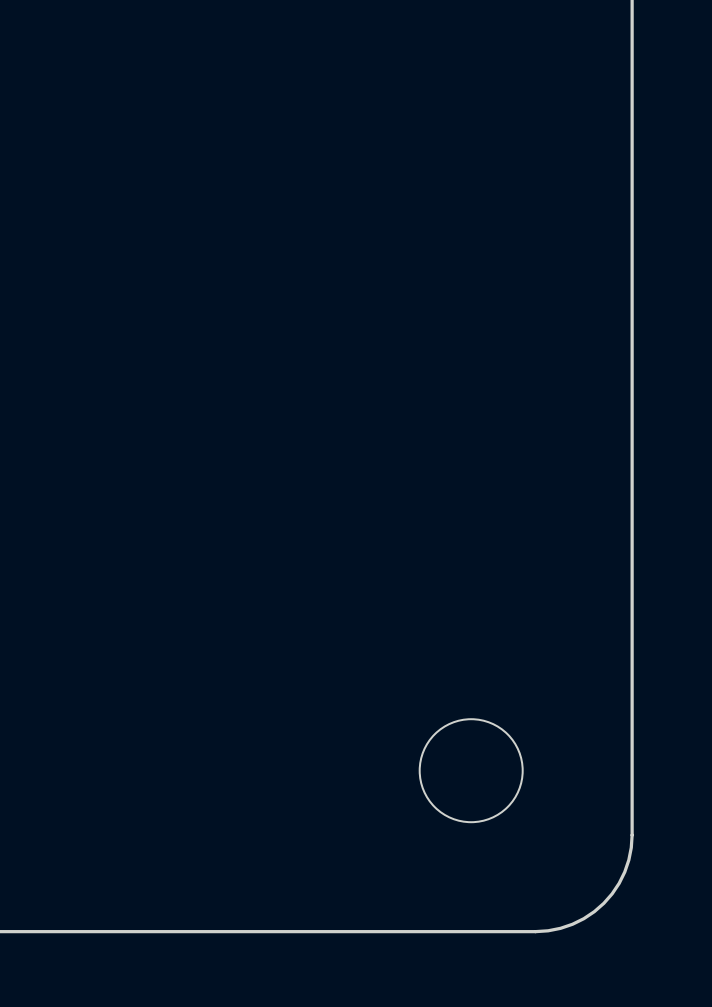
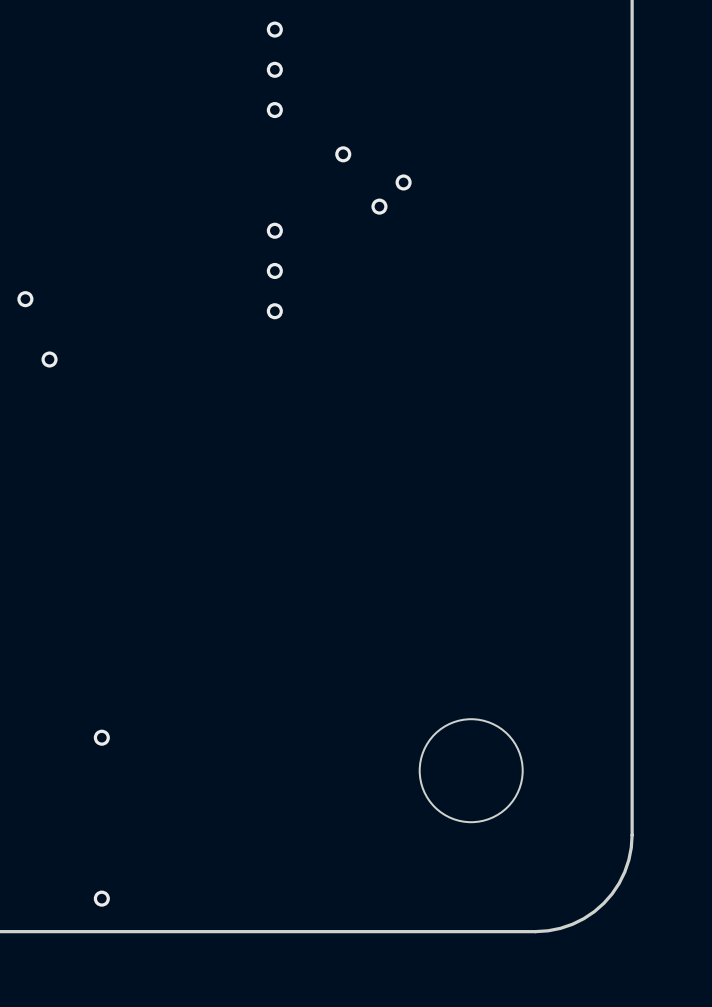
via: none -> (274, 29)
via: none -> (274, 69)
via: none -> (274, 110)
via: none -> (343, 154)
via: none -> (403, 182)
via: none -> (379, 206)
via: none -> (274, 230)
via: none -> (274, 270)
via: none -> (25, 299)
via: none -> (274, 311)
via: none -> (49, 359)
via: none -> (101, 737)
via: none -> (101, 898)

